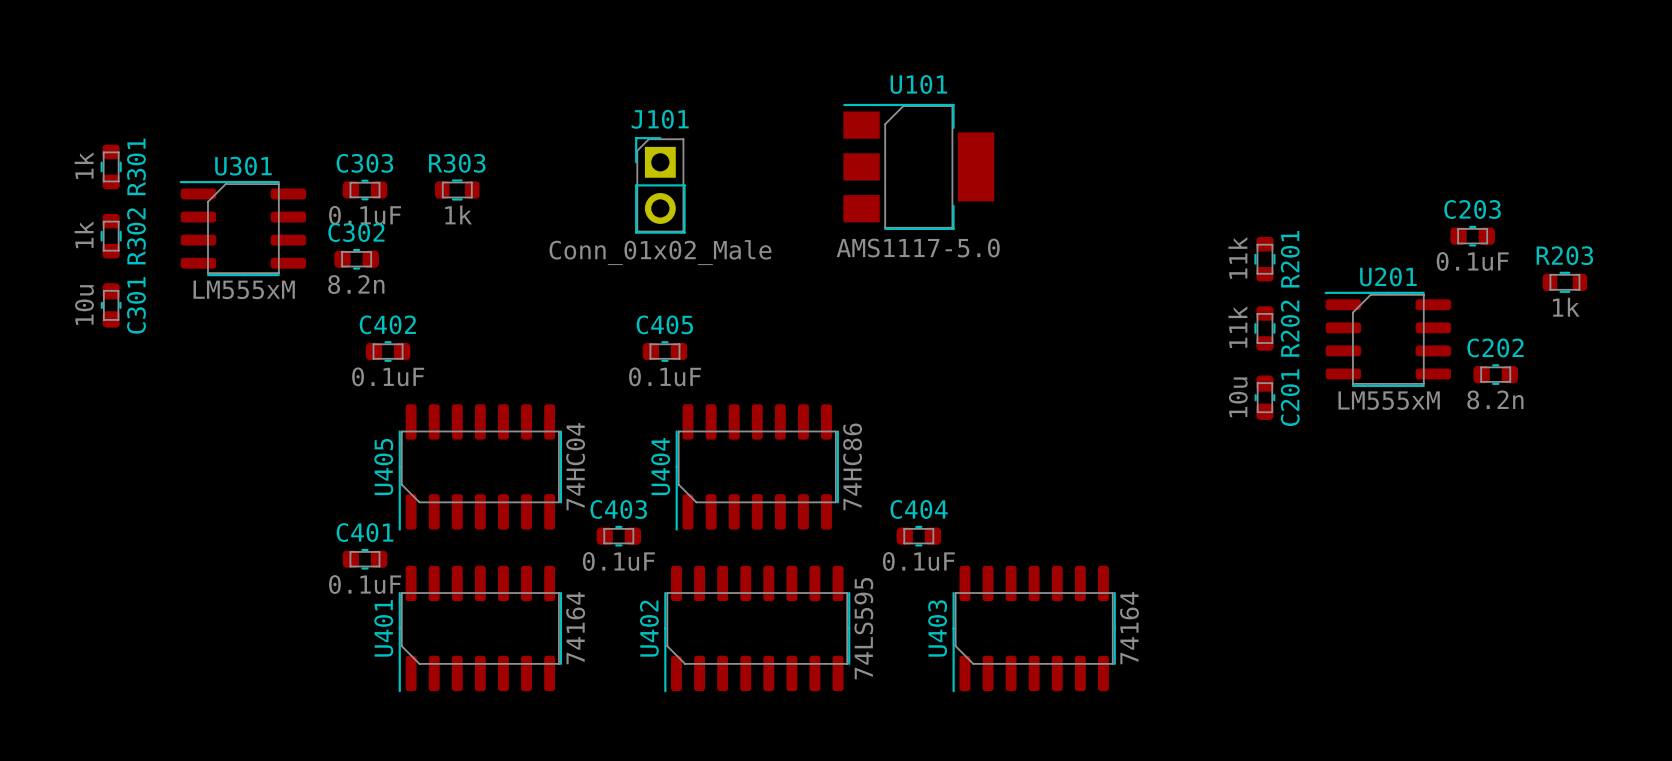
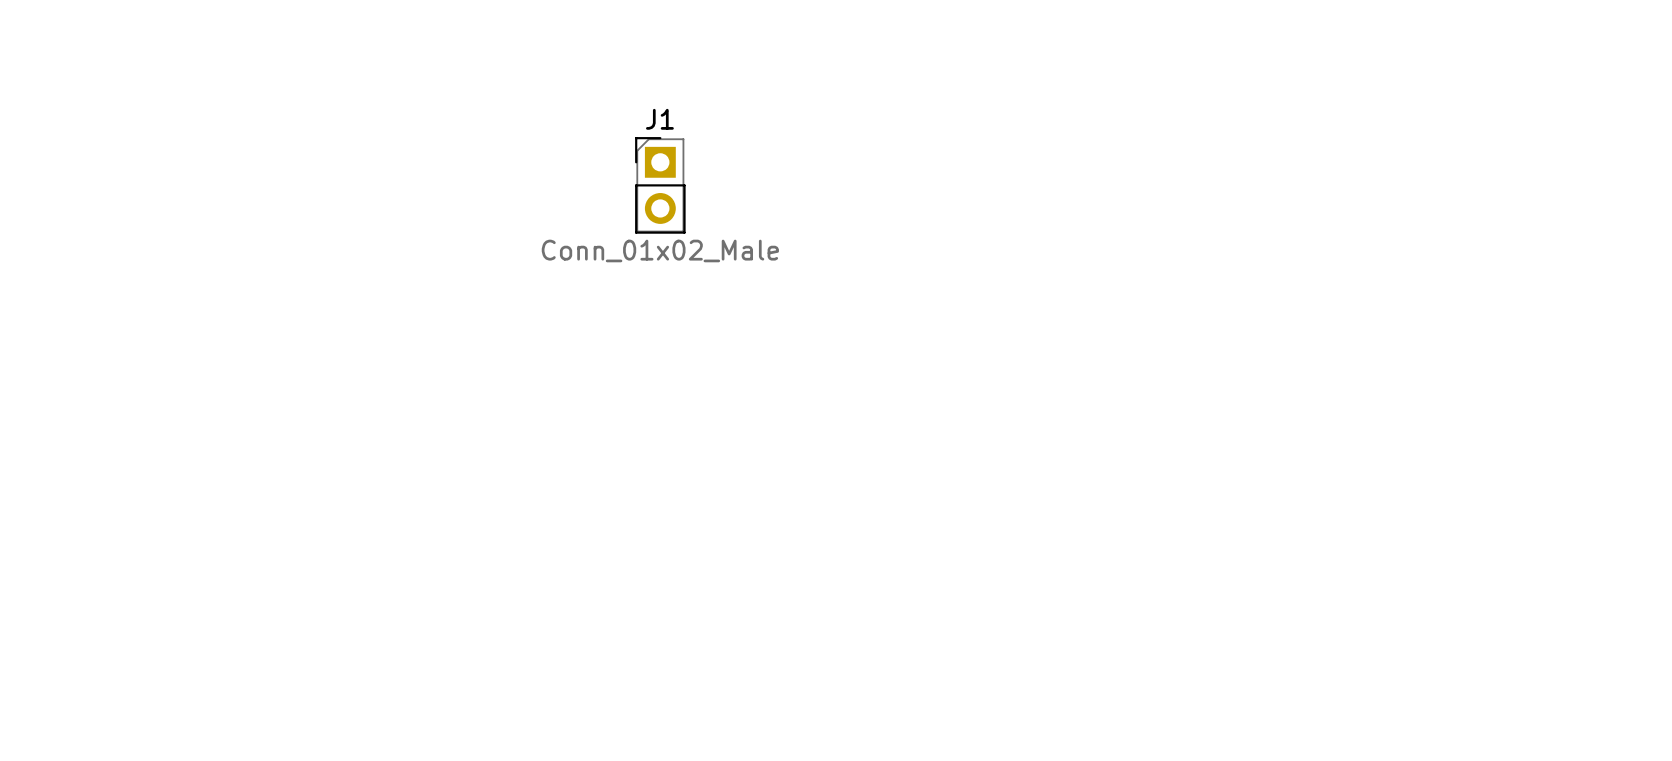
J101 name: J101 (660, 119) -> J1 (659, 119)
R301: 1k (111, 166) -> none
U101: AMS1117-5.0 (918, 166) -> none
C303: 0.1uF (364, 190) -> none
R303: 1k (457, 190) -> none
U301: LM555xM (242, 228) -> none
R302: 1k (111, 236) -> none
C203: 0.1uF (1472, 236) -> none
C302: 8.2n (356, 259) -> none
R201: 11k (1264, 259) -> none
R203: 1k (1564, 282) -> none
C301: 10u (111, 305) -> none
R202: 11k (1264, 328) -> none
U201: LM555xM (1387, 339) -> none
C402: 0.1uF (388, 351) -> none
C405: 0.1uF (664, 351) -> none
C202: 8.2n (1495, 374) -> none
C201: 10u (1264, 397) -> none
U405: 74HC04 (480, 467) -> none
U404: 74HC86 (757, 467) -> none
C403: 0.1uF (618, 536) -> none
C404: 0.1uF (918, 536) -> none
C401: 0.1uF (364, 559) -> none
U401: 74164 (480, 628) -> none
U402: 74LS595 (757, 628) -> none
U403: 74164 (1034, 628) -> none

